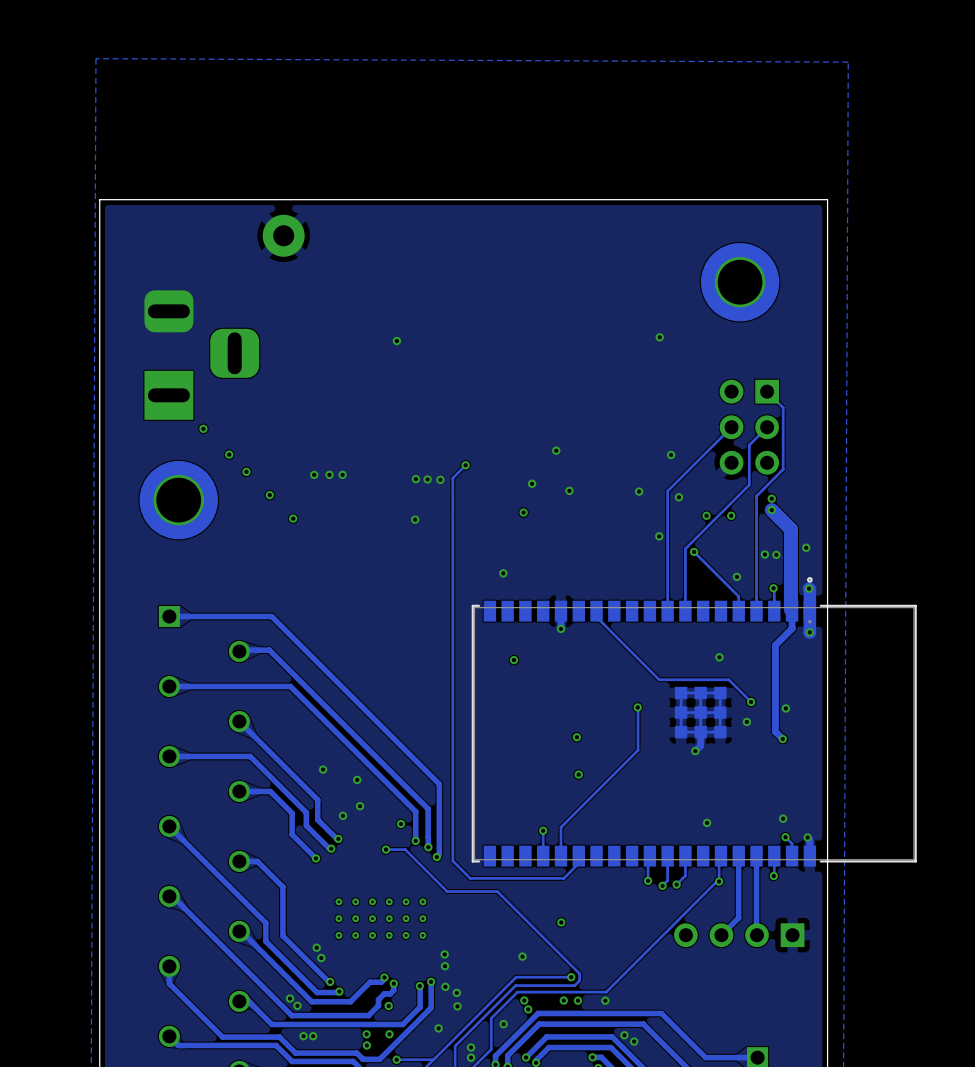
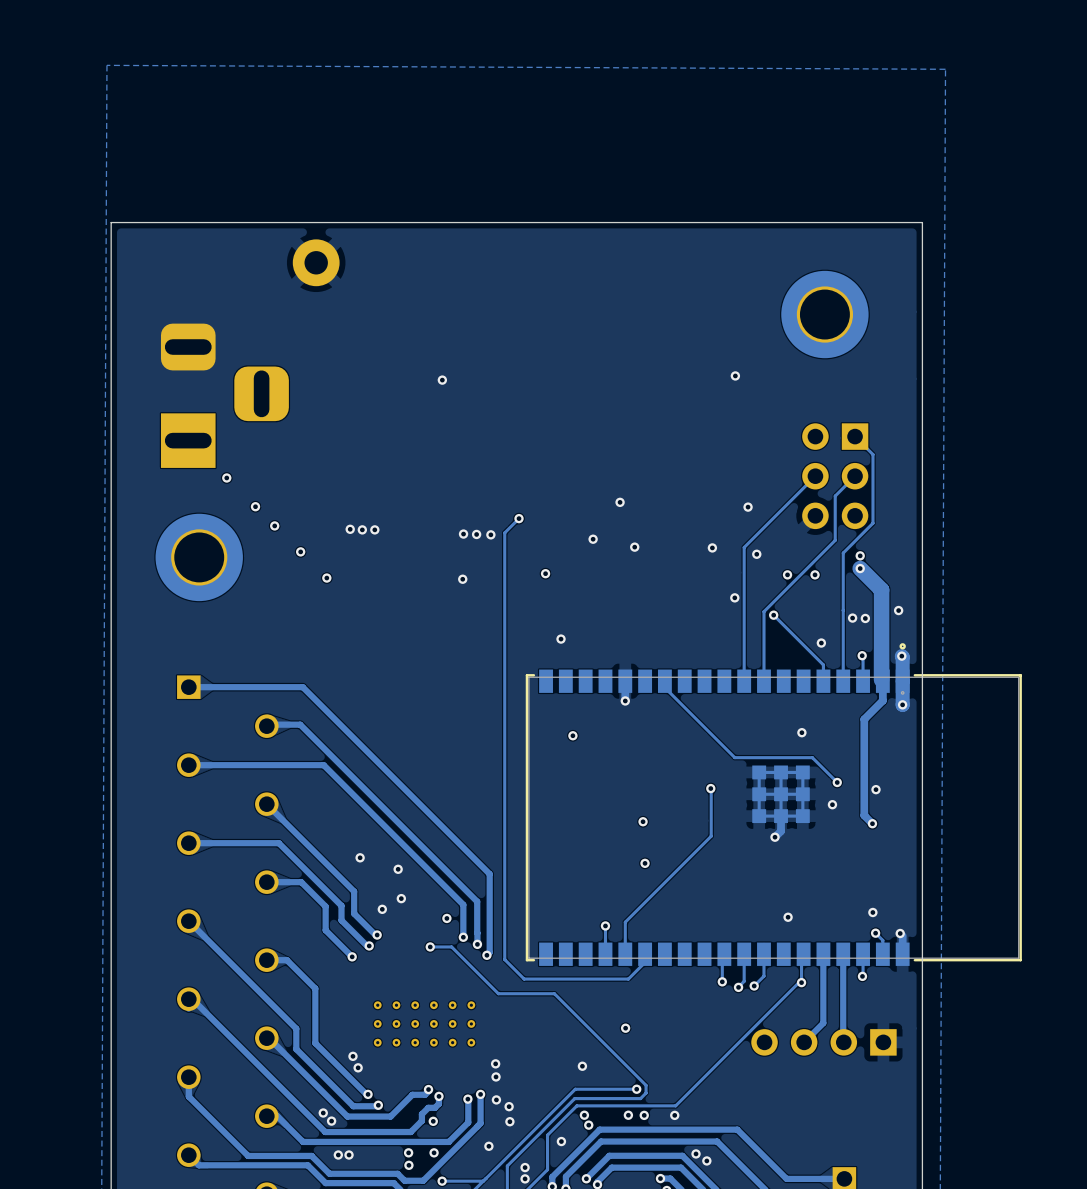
via: (329, 474) -> none
via: (342, 474) -> none
via: none -> (362, 529)
via: none -> (374, 529)
via position: (523, 512) -> (545, 573)

